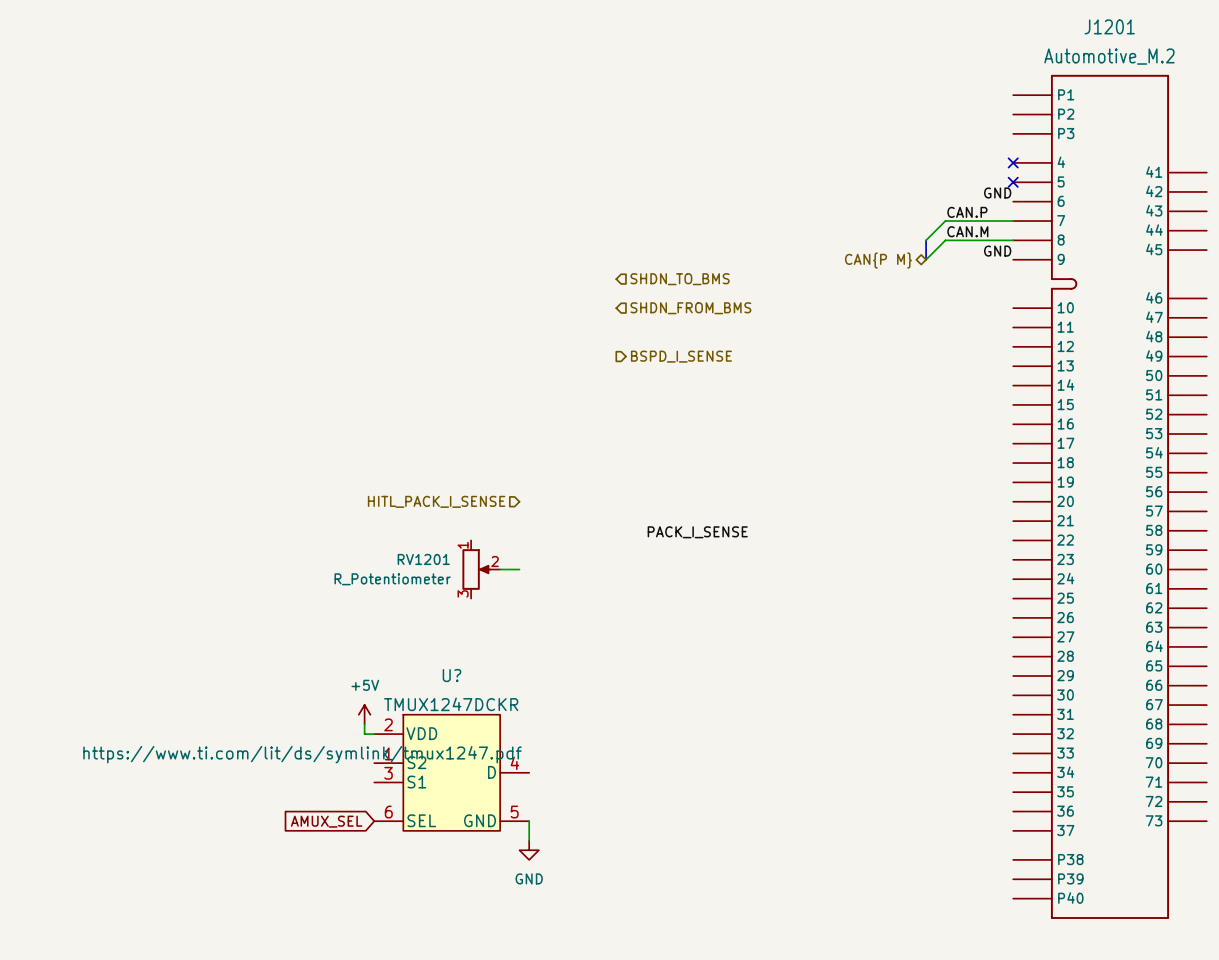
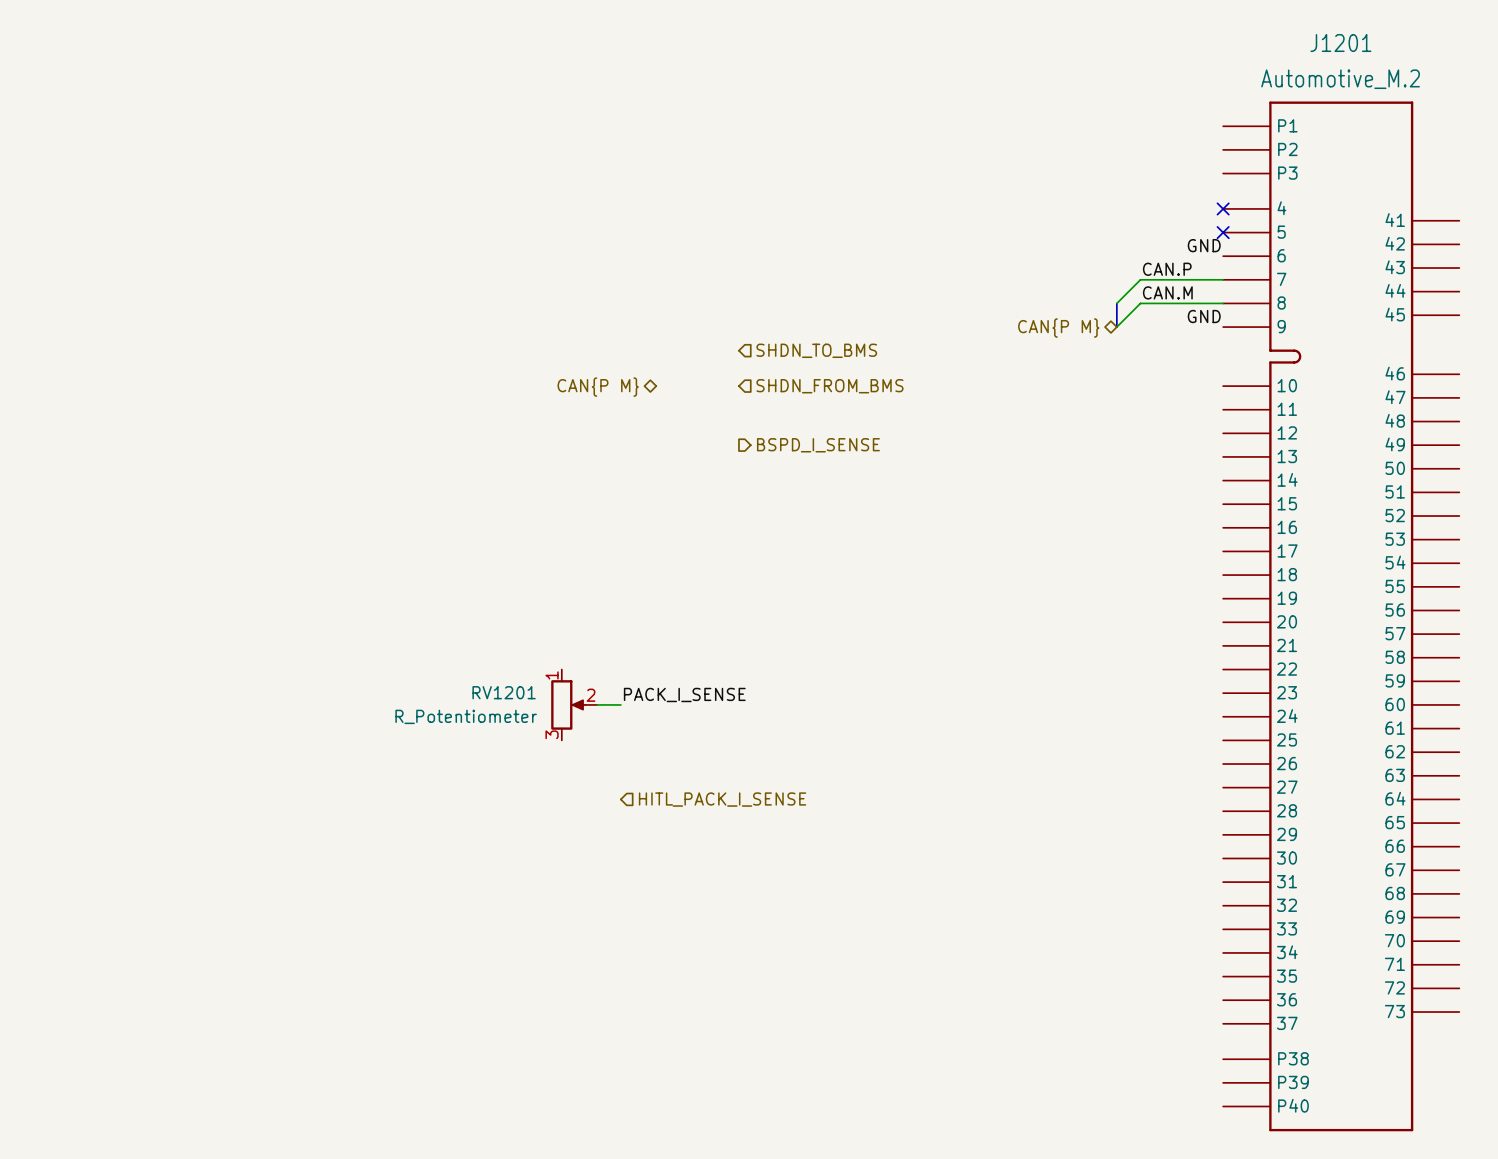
hierarchical label: none -> CAN{P M} (598, 387)
hierarchical label rotation: 0° (436, 501) -> 180° (722, 799)
hierarchical label position: HITL_PACK_I_SENSE (436, 501) -> HITL_PACK_I_SENSE (722, 799)
label position: PACK_I_SENSE (697, 532) -> PACK_I_SENSE (684, 694)
power symbol: +5V (364, 714) -> none
wire: (364, 724) (364, 734) (374, 734) -> none
U?: TMUX1247DCKR (451, 772) -> none
global label: AMUX_SEL (326, 821) -> none
wire: (529, 821) (529, 840) -> none
power symbol: GND (529, 850) -> none

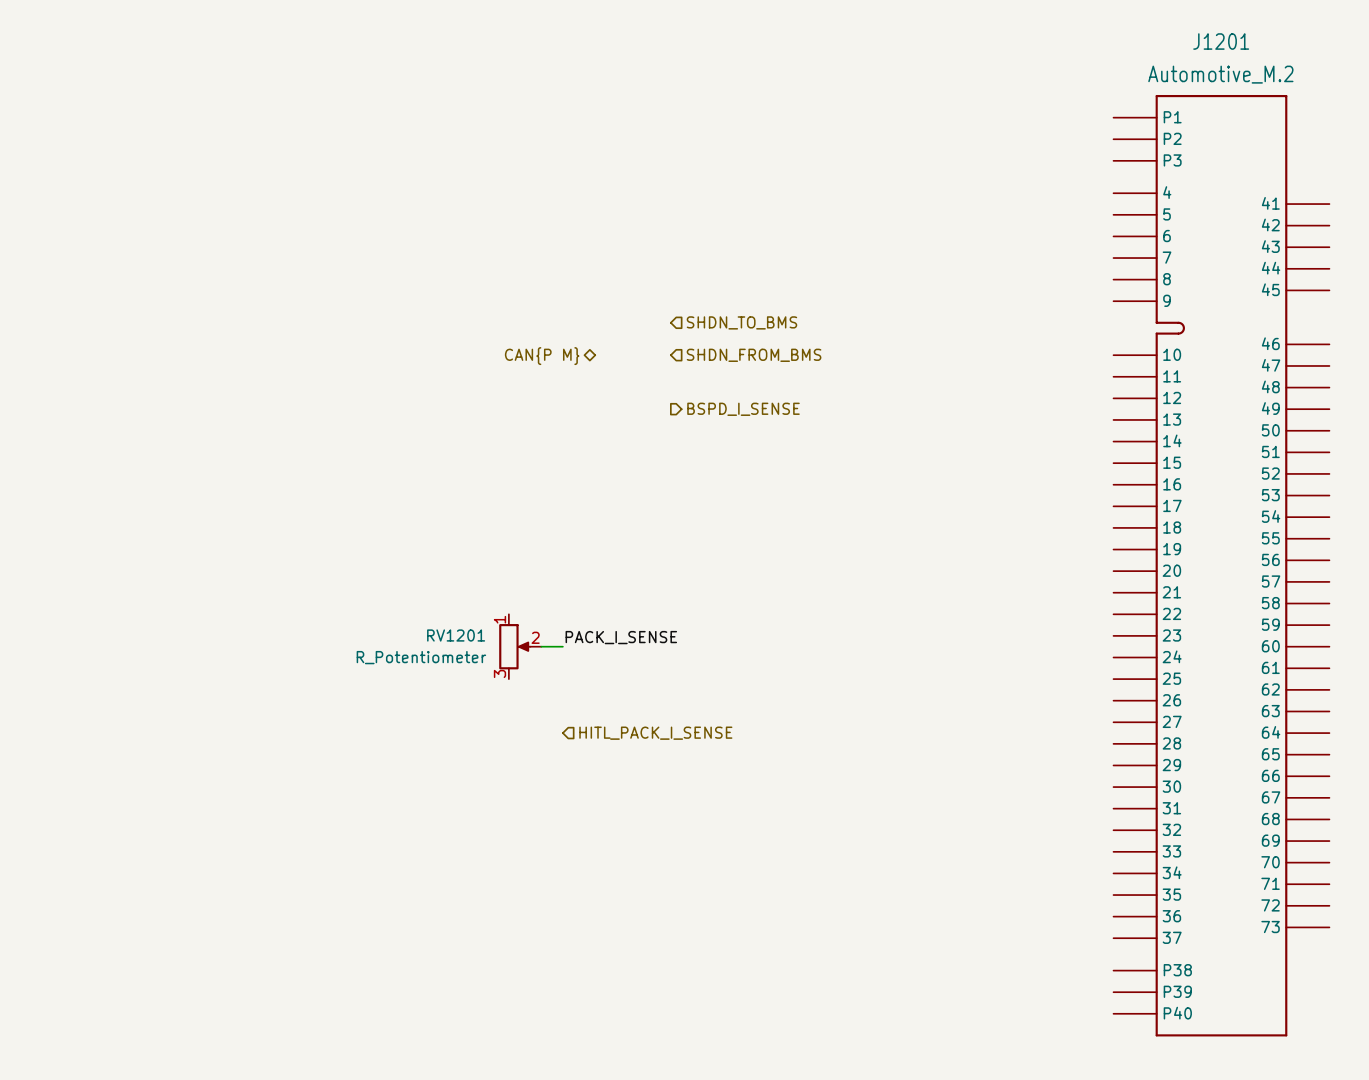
no-connect mark: (1223, 208) -> none
no-connect mark: (1223, 232) -> none
label: GND (1204, 245) -> none
label: CAN.P (1167, 269) -> none
wire: (1223, 279) (1140, 279) (1116, 303) -> none
label: CAN.M (1167, 292) -> none
bus: (1116, 303) (1116, 327) -> none
wire: (1223, 303) (1140, 303) (1116, 327) -> none
label: GND (1204, 316) -> none
hierarchical label: CAN{P M} (1058, 328) -> none

